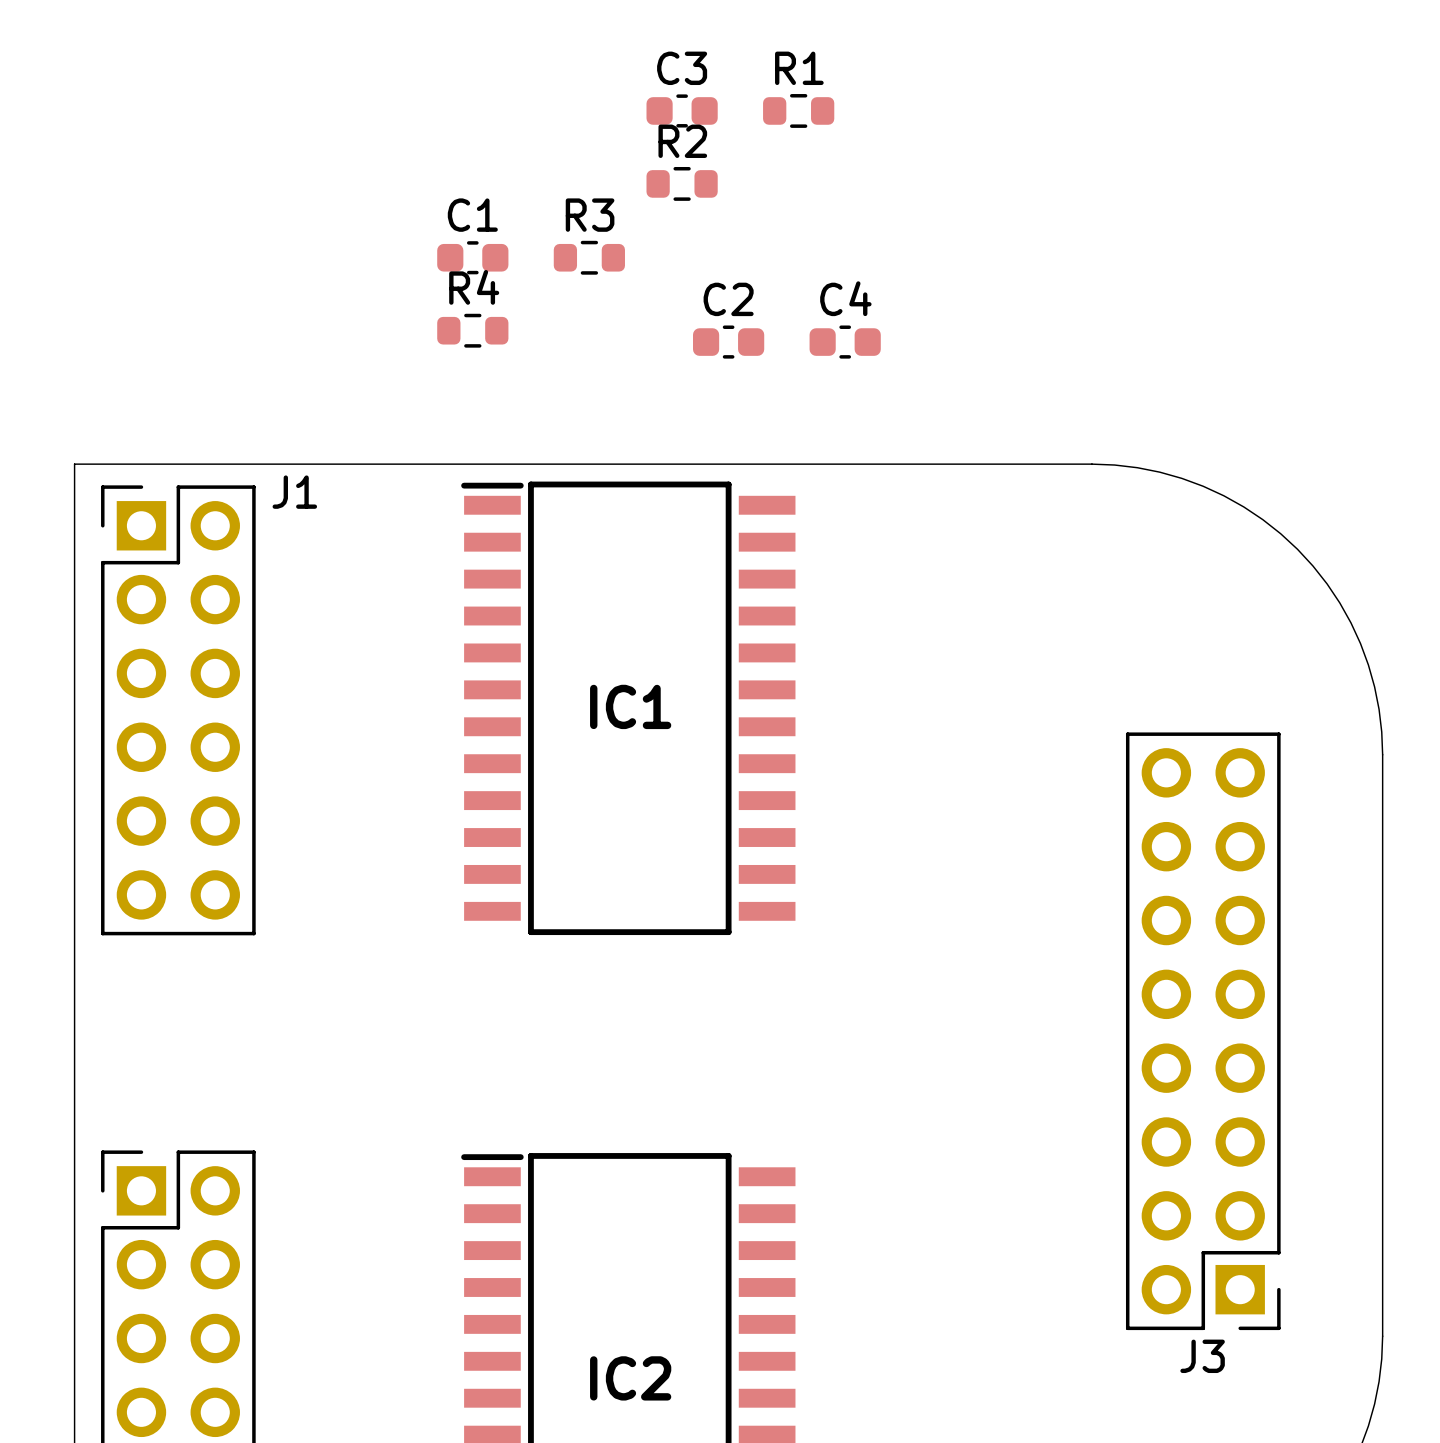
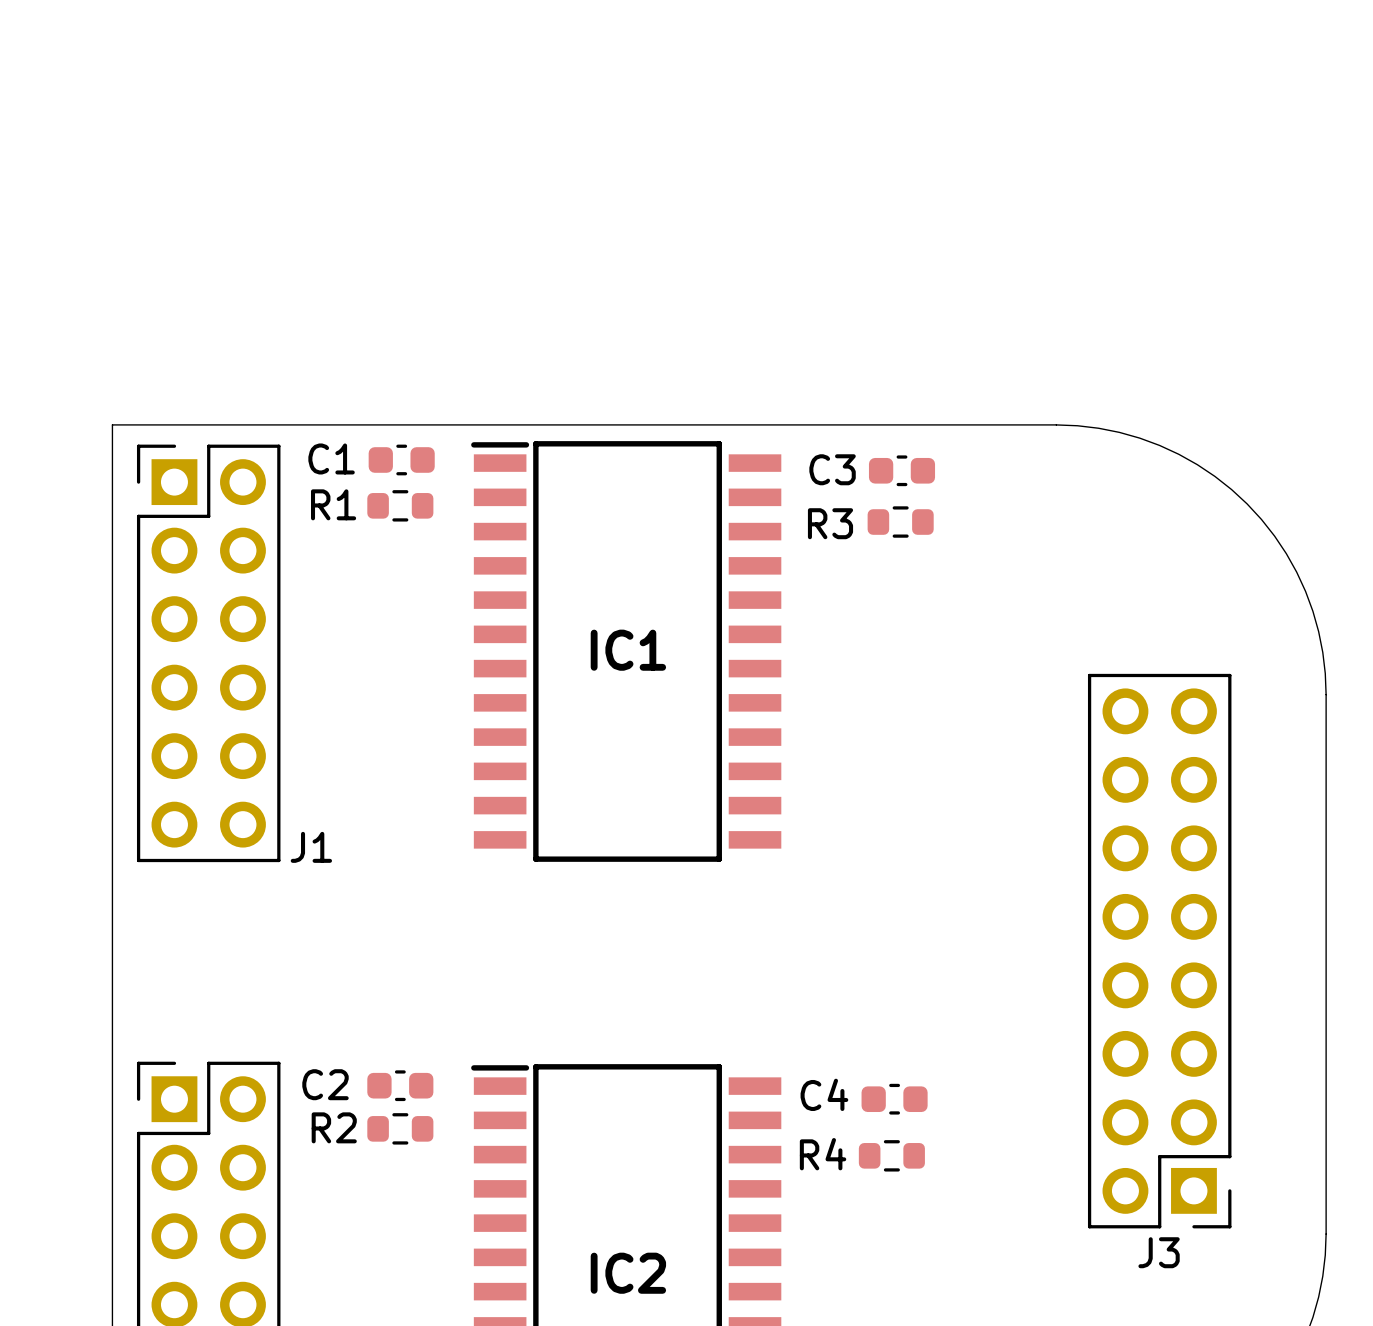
C3 name position: C3 (682, 68) -> C3 (832, 469)
R1 name position: R1 (799, 68) -> R1 (333, 504)
C3 position: (682, 110) -> (902, 470)
R1 position: (798, 110) -> (400, 505)
R2 name position: R2 (682, 141) -> R2 (334, 1127)
R2 position: (682, 183) -> (400, 1128)
C1 name position: C1 (472, 215) -> C1 (331, 458)
R3 name position: R3 (590, 215) -> R3 (830, 523)
C1 position: (472, 257) -> (401, 459)
R3 position: (589, 257) -> (900, 522)
R4 name position: R4 (474, 287) -> R4 (823, 1154)
C4 name position: C4 (845, 298) -> C4 (824, 1094)
C2 name position: C2 (728, 299) -> C2 (325, 1084)
R4 position: (472, 330) -> (891, 1155)
C2 position: (728, 342) -> (400, 1085)
C4 position: (845, 342) -> (894, 1099)
J1 name position: J1 (294, 492) -> J1 (311, 847)

